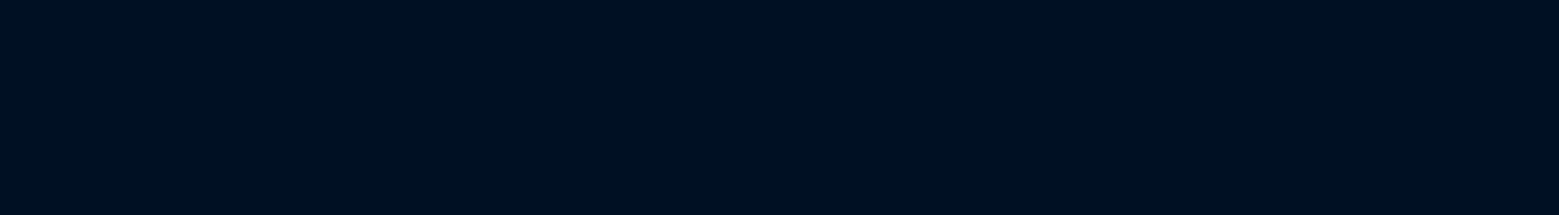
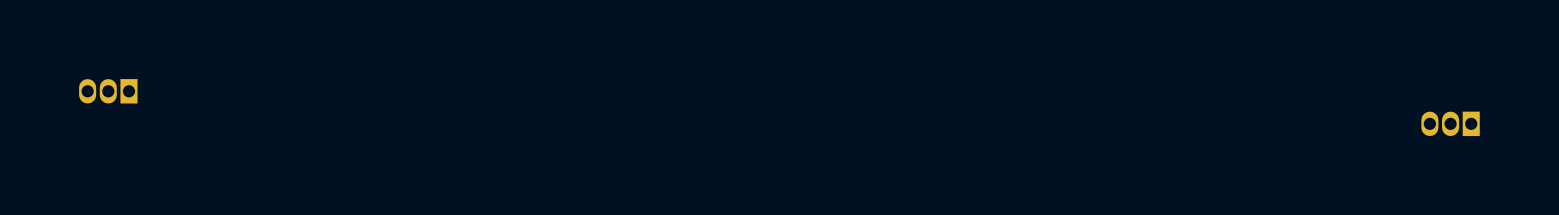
part: none -> (108, 91)
part: none -> (1450, 123)

